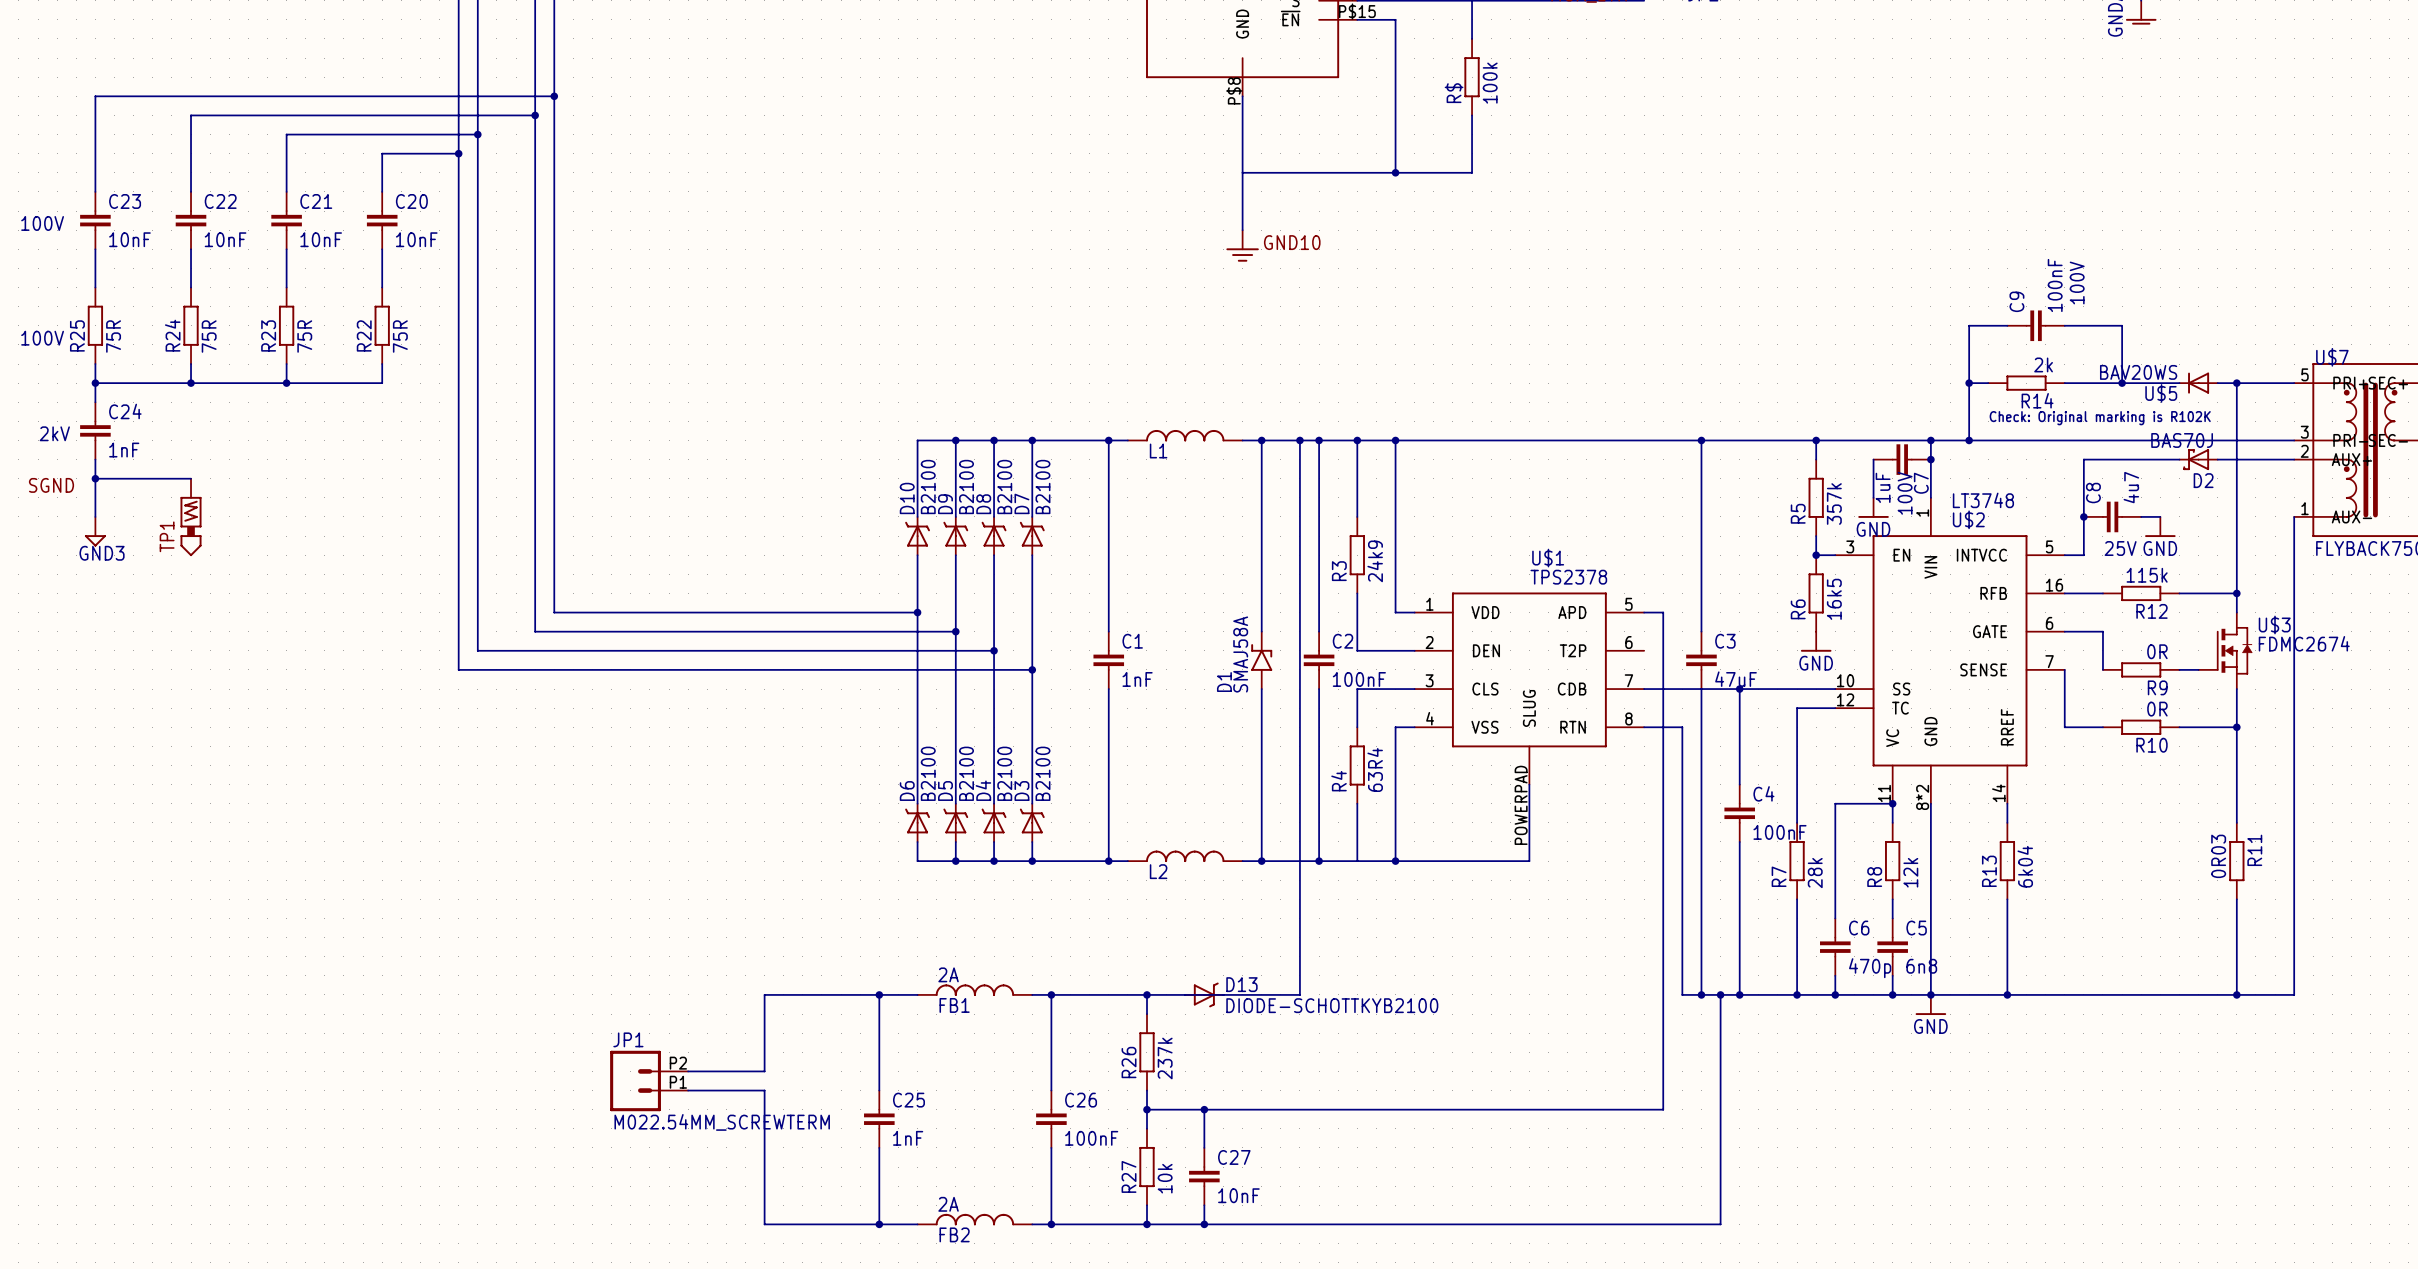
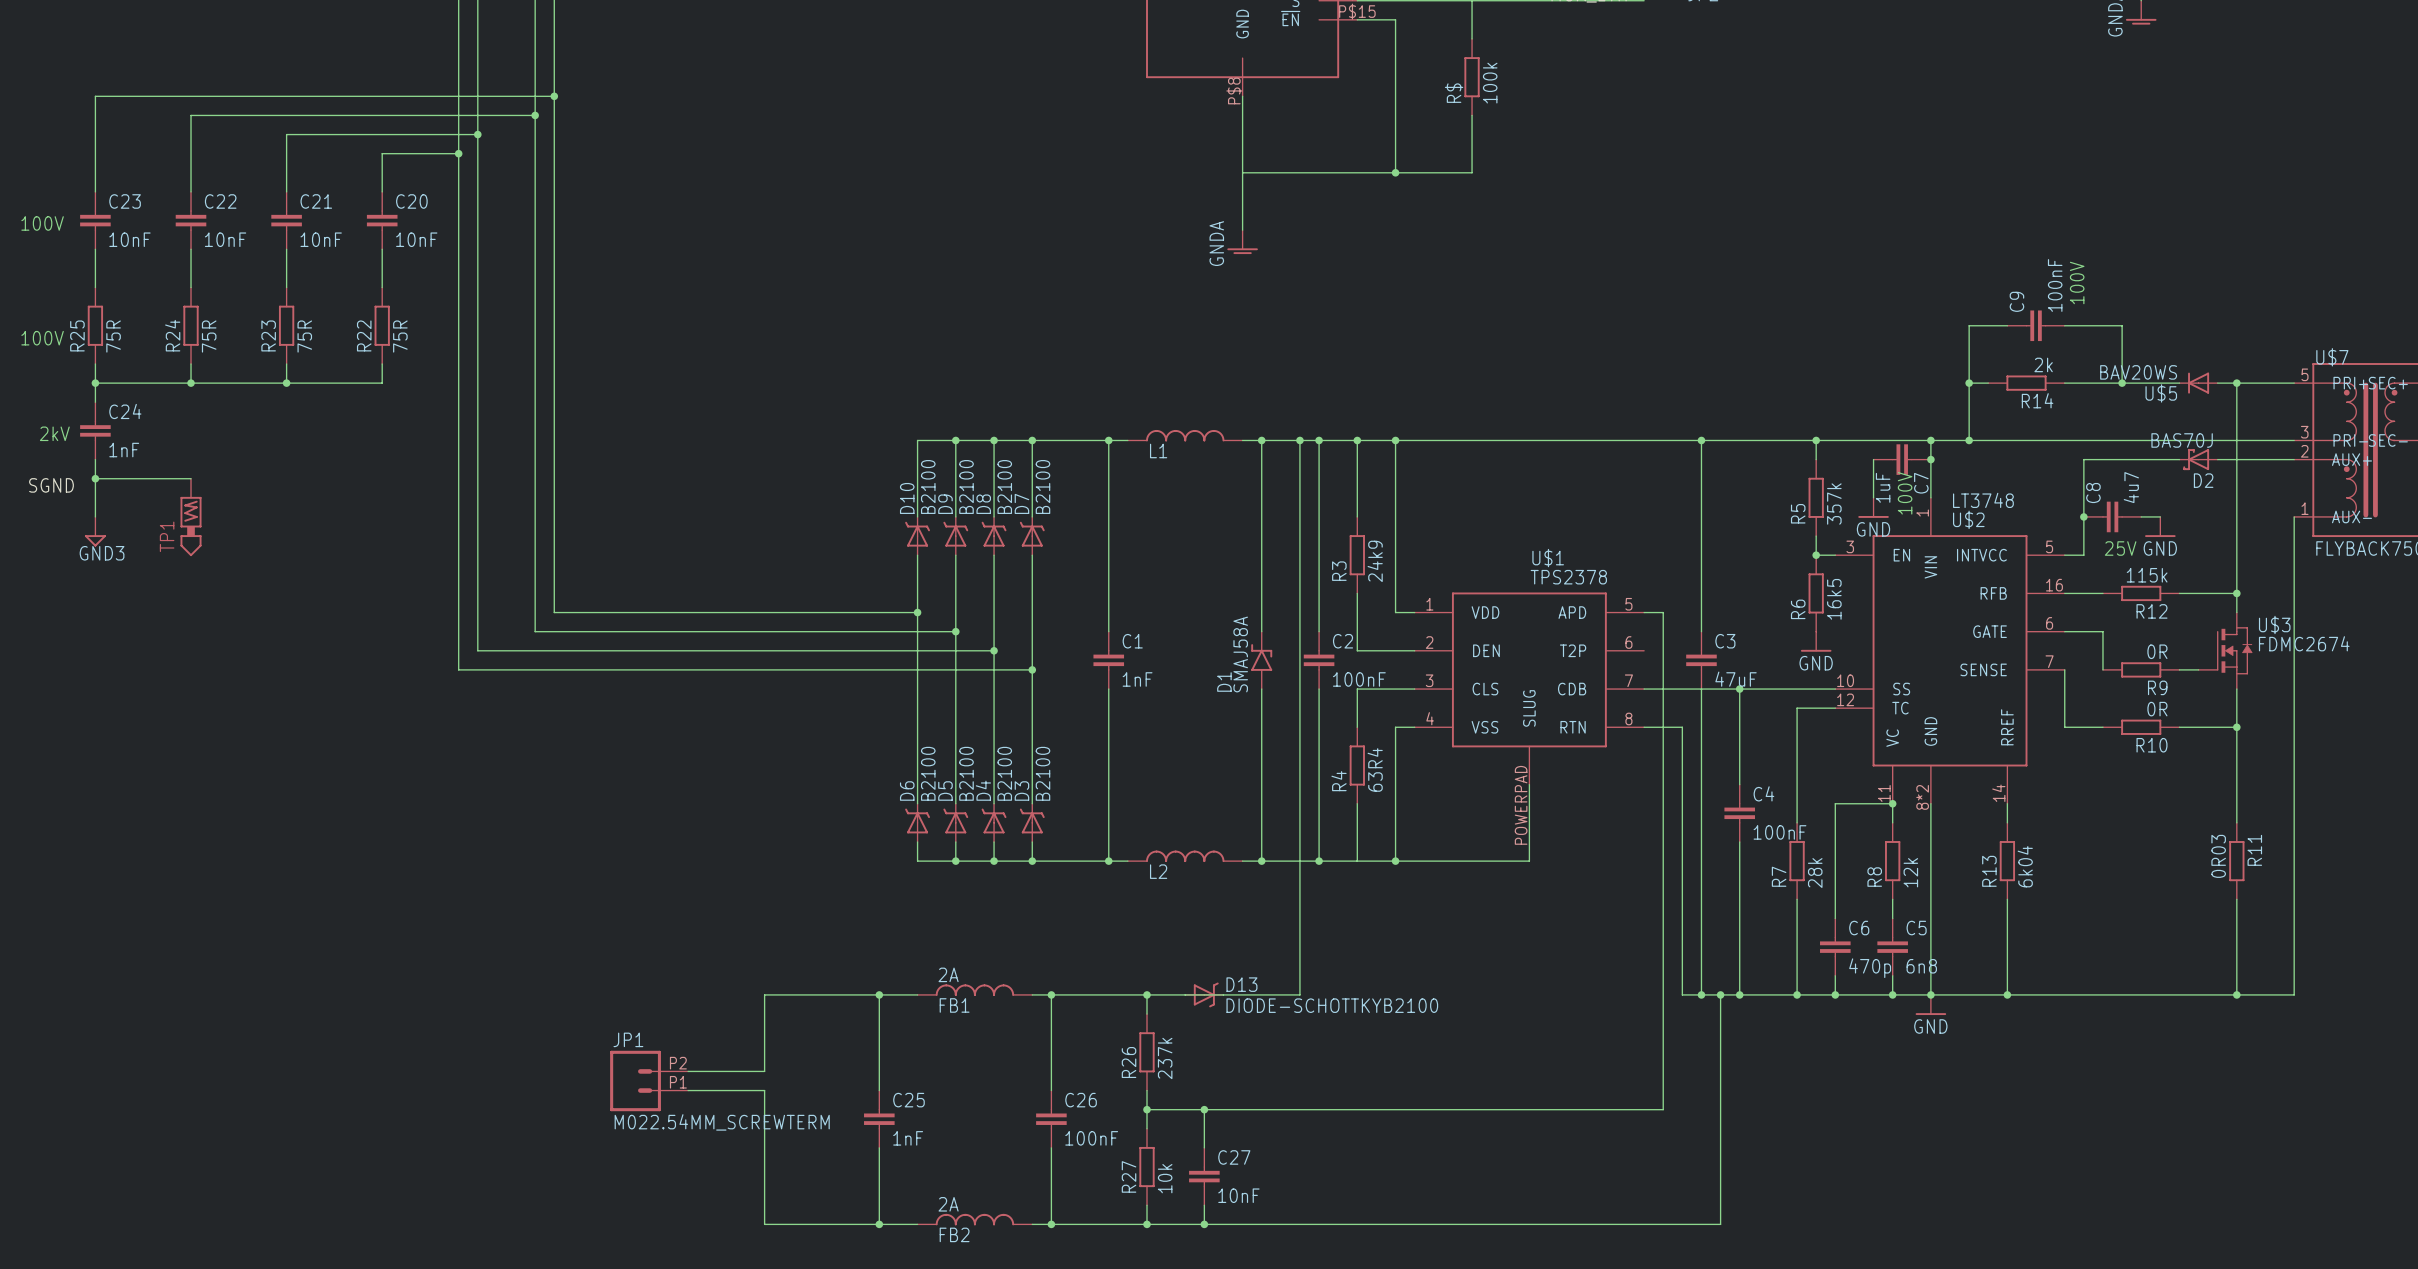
GND10 shape: [1226, 230, 1259, 262] -> [1227, 230, 1258, 255]
GND10 name: GND10 (1292, 242) -> none
GND10 text: none -> GNDA (1216, 243)
text: Check: Original marking is R102K (2100, 418) -> none

